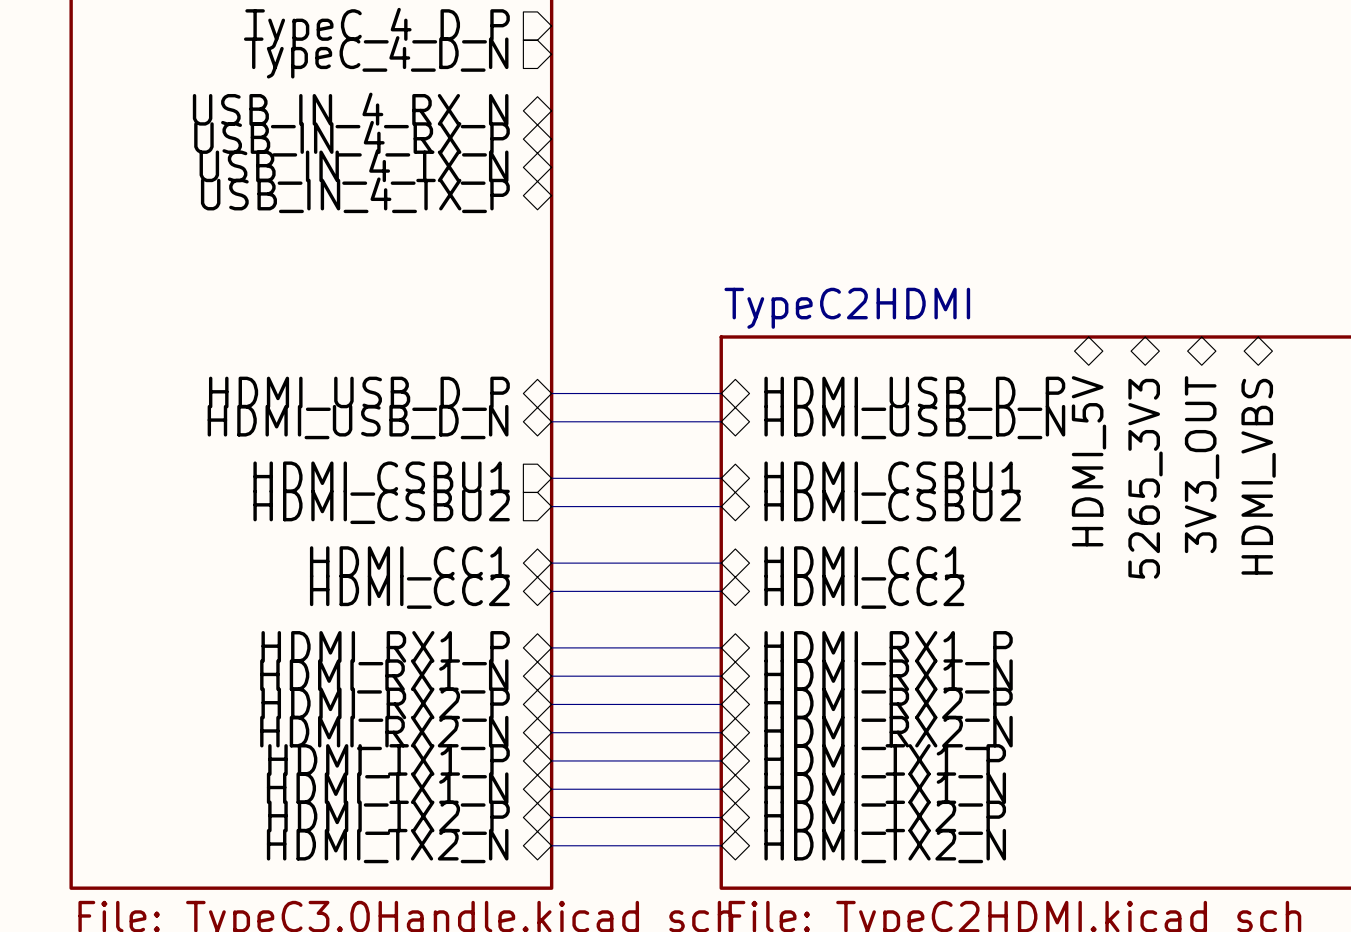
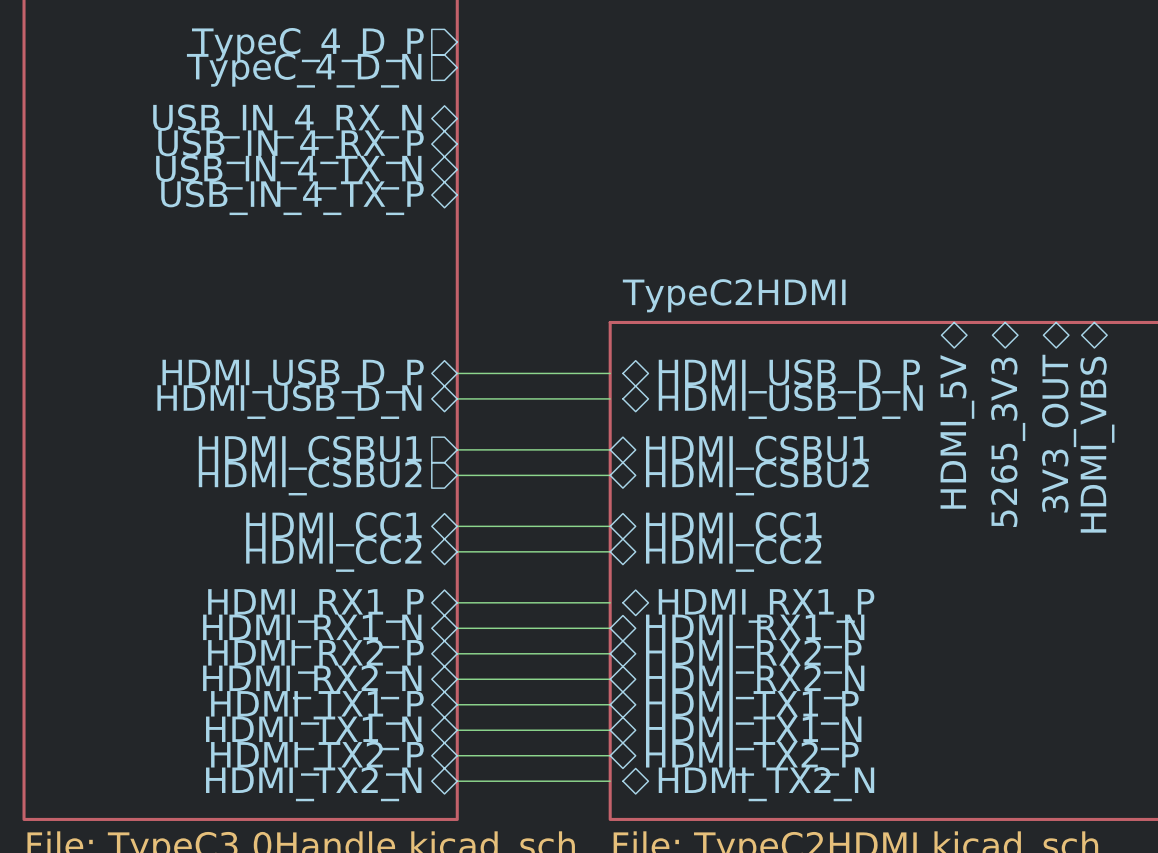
sheet TypeC2HDMI name position: TypeC2HDMI (847, 308) -> TypeC2HDMI (734, 295)
sheet pin position: HDMI_USB_D_P (914, 393) -> HDMI_USB_D_P (789, 376)
sheet pin position: HDMI_USB_D_N (914, 422) -> HDMI_USB_D_N (790, 401)
sheet pin position: HDMI_5V (1088, 461) -> HDMI_5V (957, 431)
sheet pin position: 3V3_OUT (1202, 464) -> 3V3_OUT (1059, 433)
sheet pin position: 5265_3V3 (1145, 478) -> 5265_3V3 (1008, 442)
sheet pin position: HDMI_RX1_P (888, 648) -> HDMI_RX1_P (766, 605)
sheet pin position: HDMI_TX2_N (885, 846) -> HDMI_TX2_N (766, 784)

